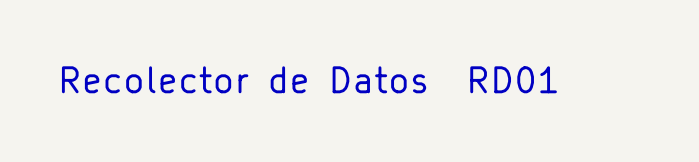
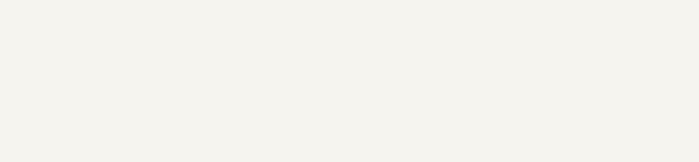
text: Recolector de Datos RD01 (309, 79) -> none

